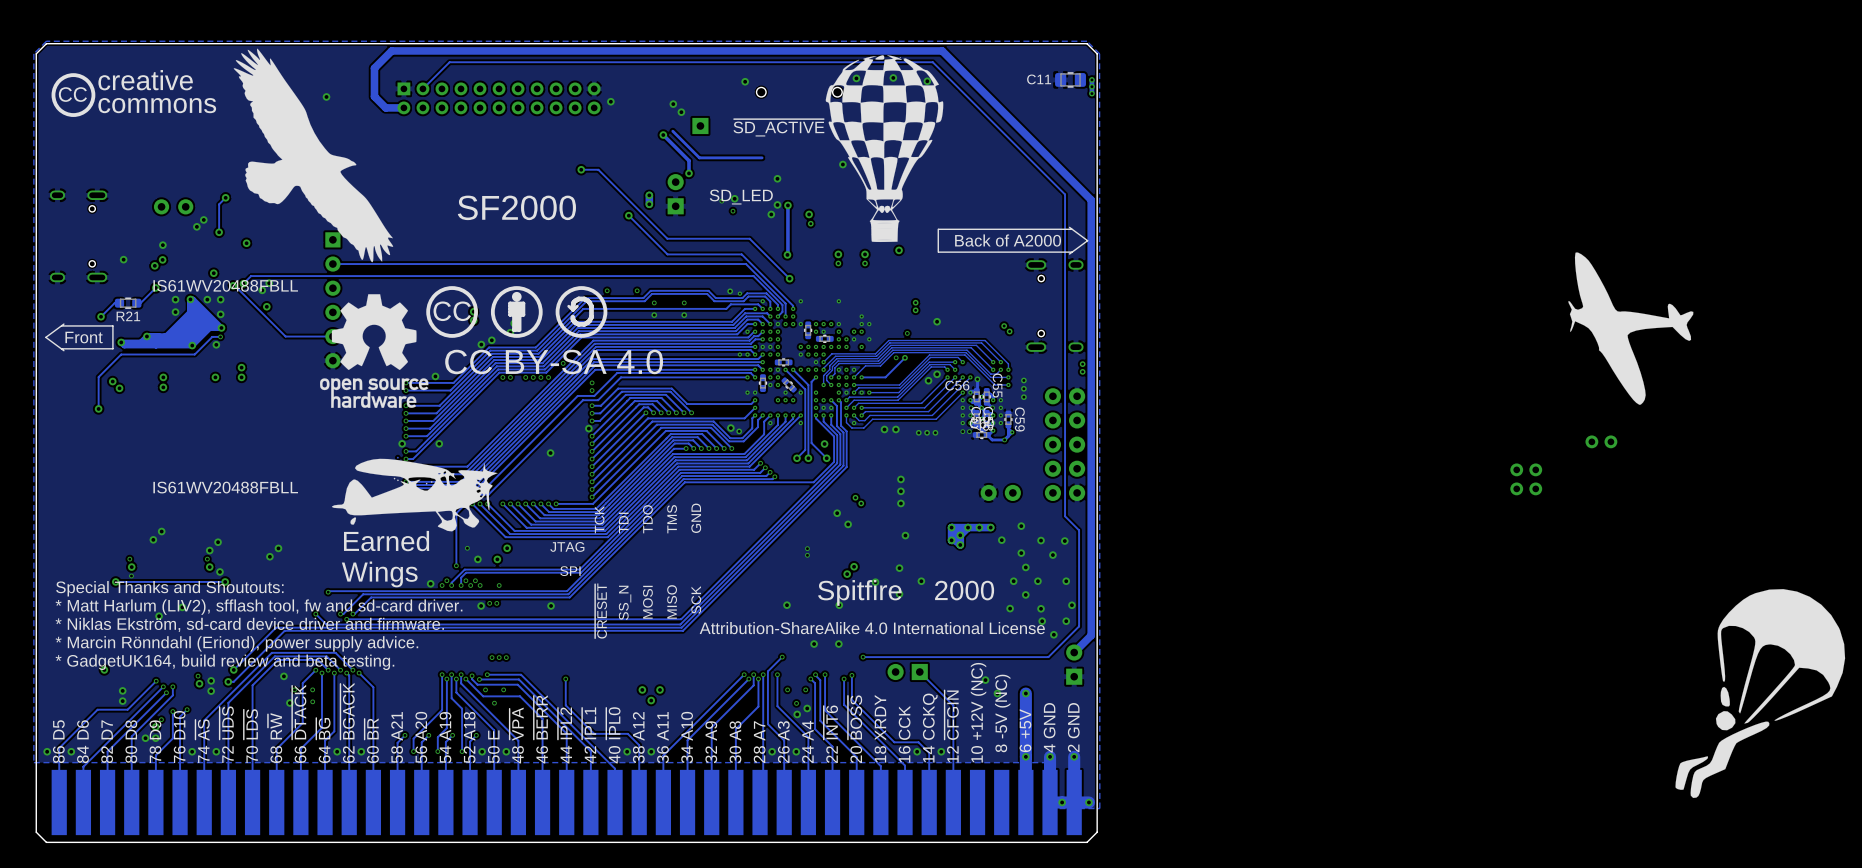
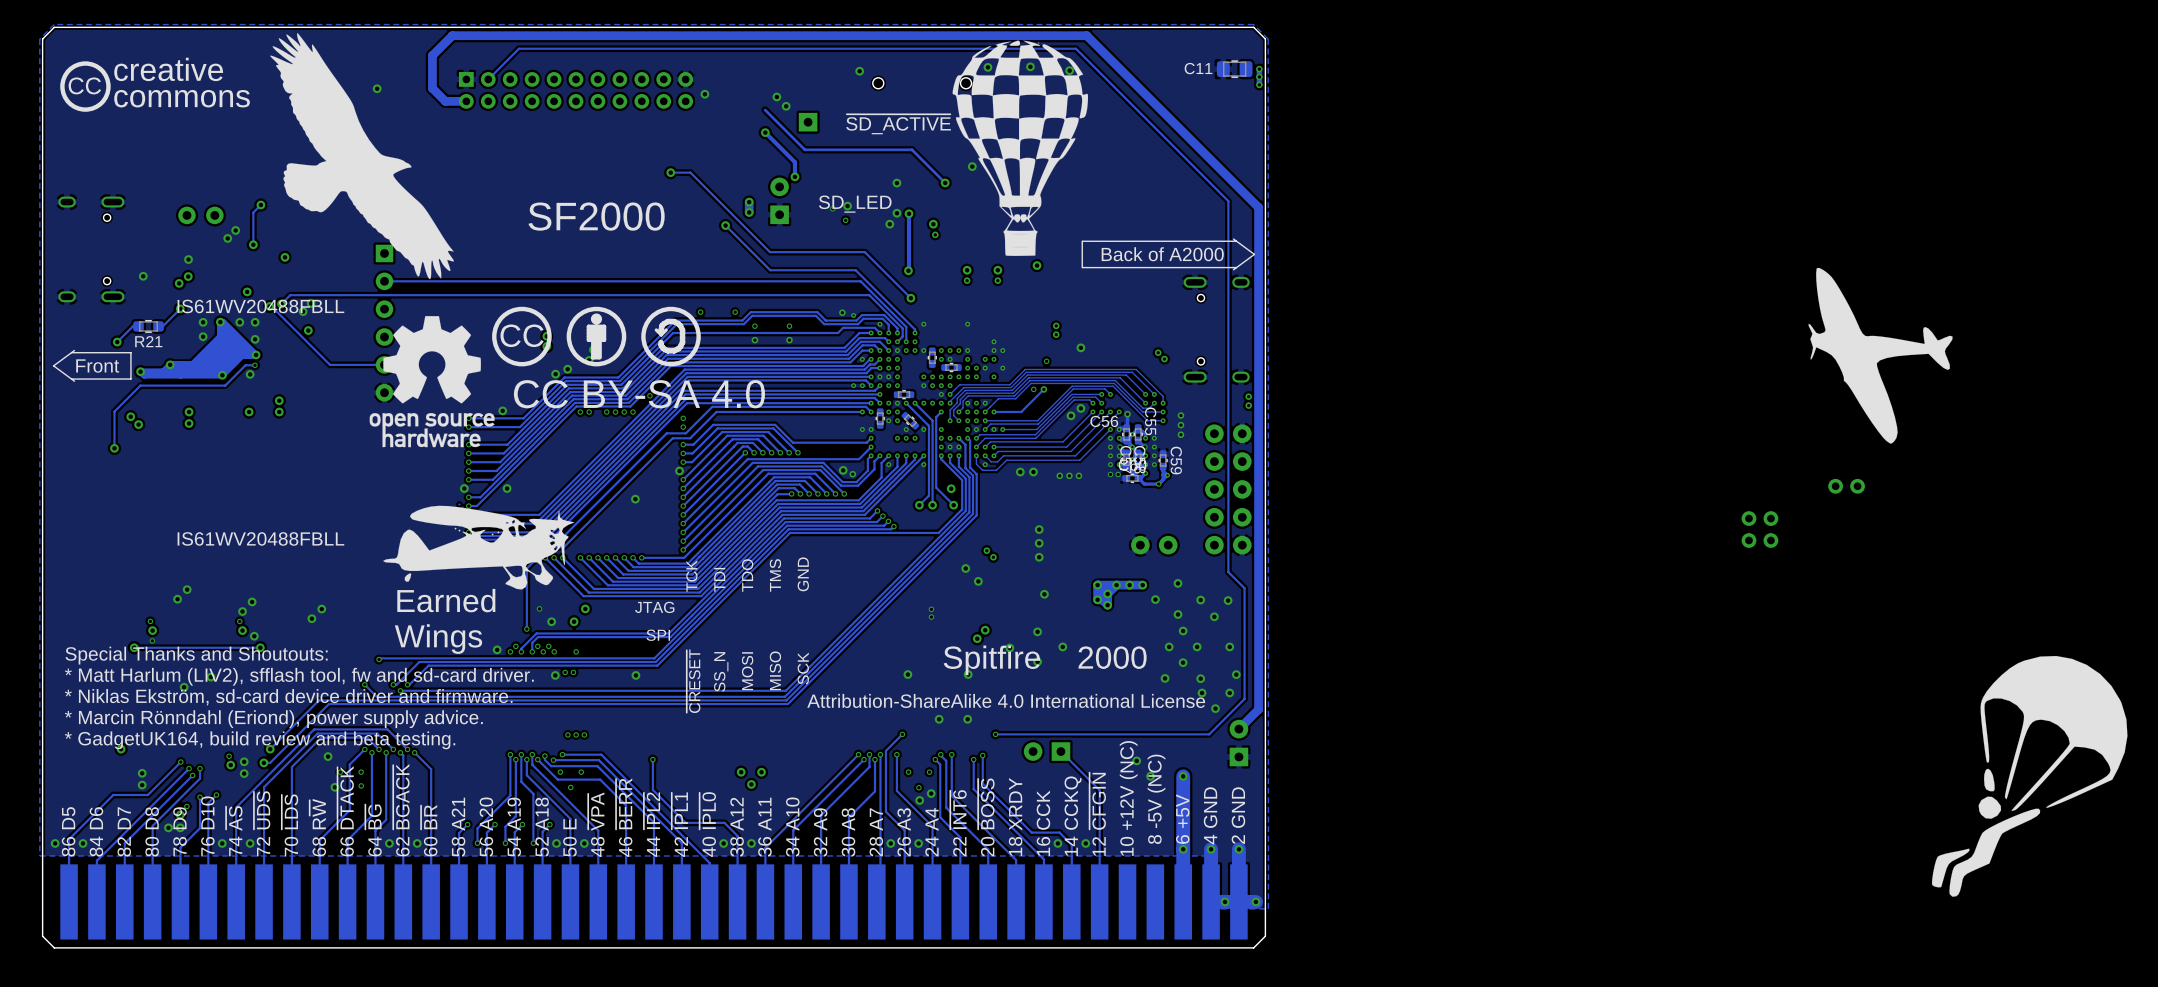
track: none -> (765, 110) (804, 149) (912, 149) (945, 182)
track: (672, 131) (699, 157) (762, 157) -> none
via: none -> (945, 182)

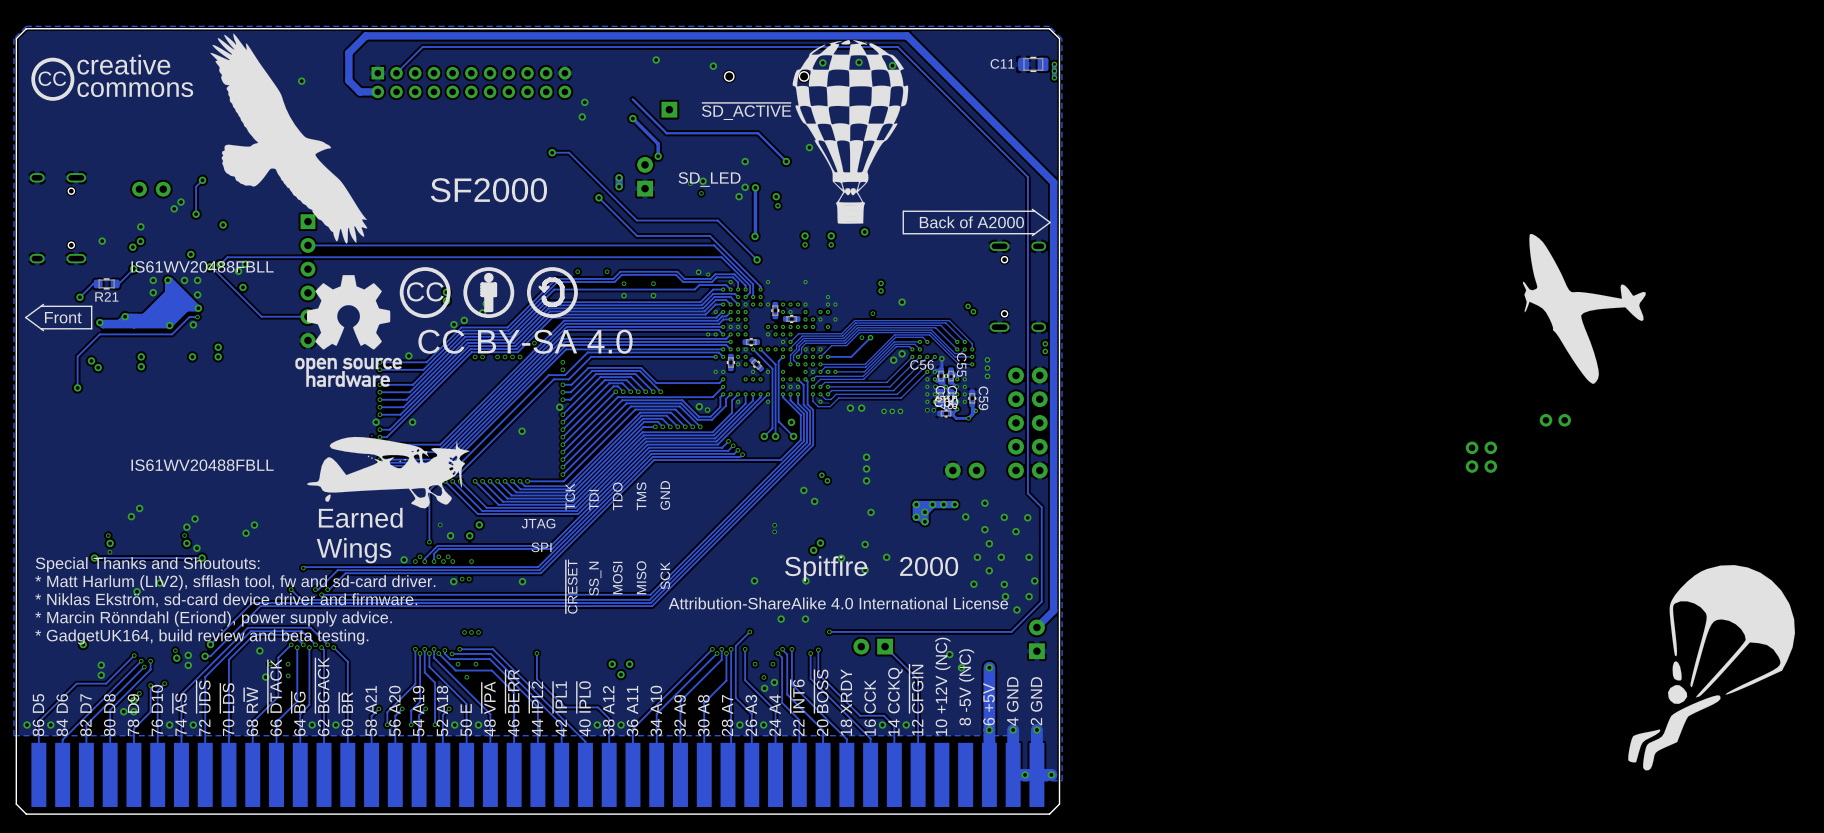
via: none -> (656, 60)
via: (704, 94) -> none
via: (776, 96) -> none
via: (786, 106) -> none
via: none -> (584, 102)
via: none -> (582, 116)

